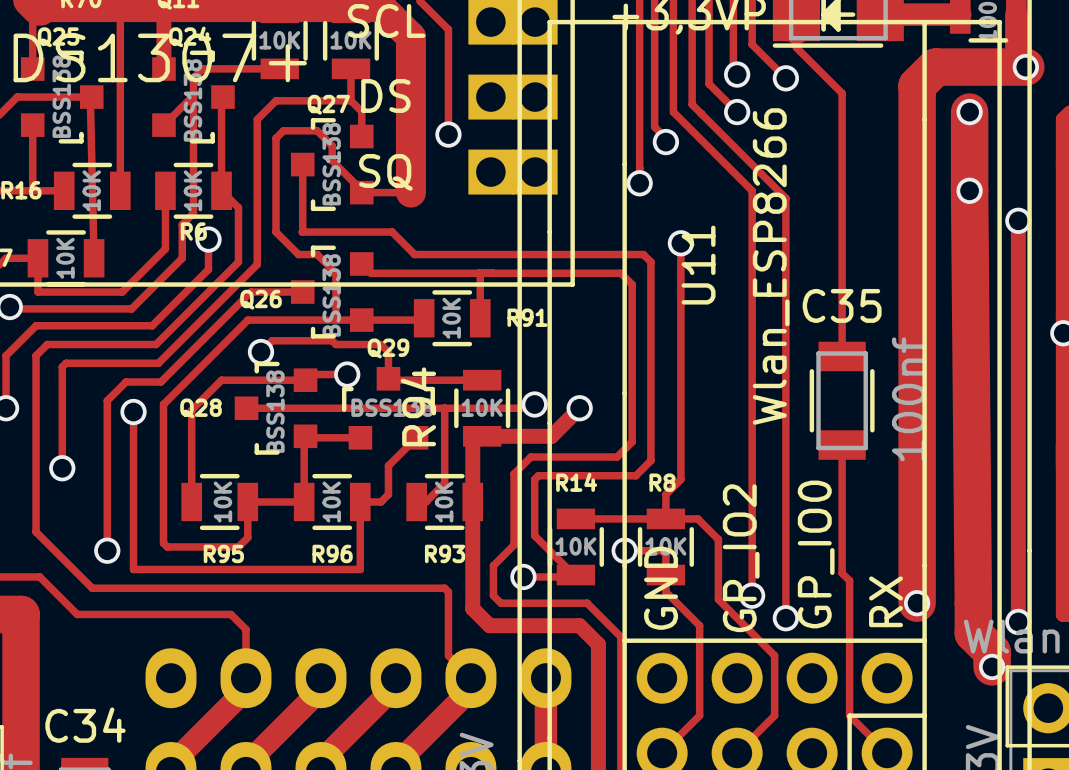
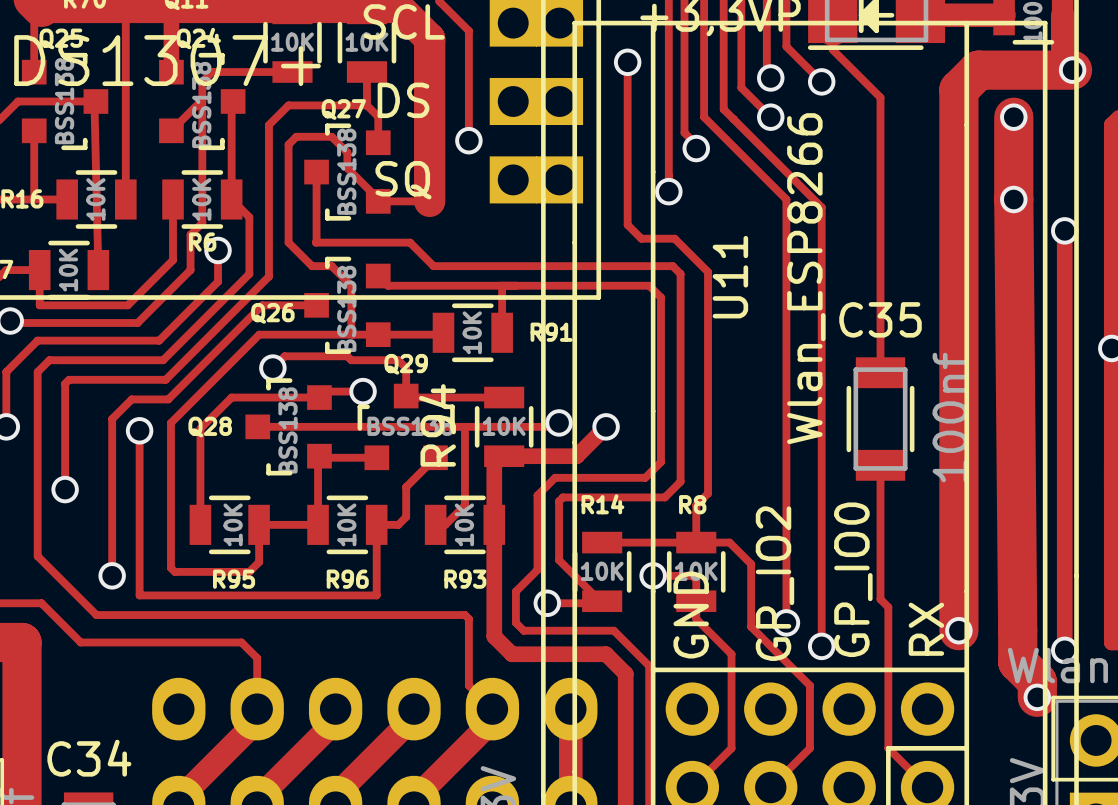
via: none -> (627, 62)
track: (680, 243) (680, 479) (665, 494) -> (627, 62) (627, 224) (641, 238) (674, 238) (708, 272) (708, 493) (696, 505) (696, 517)
via: (680, 243) -> none

